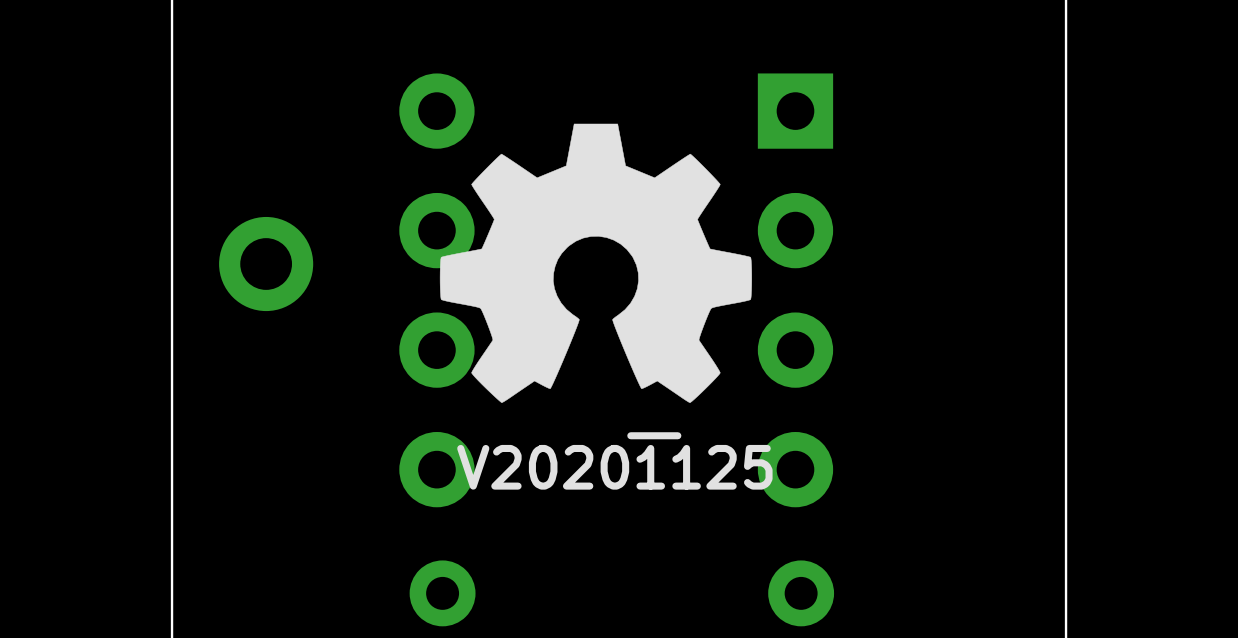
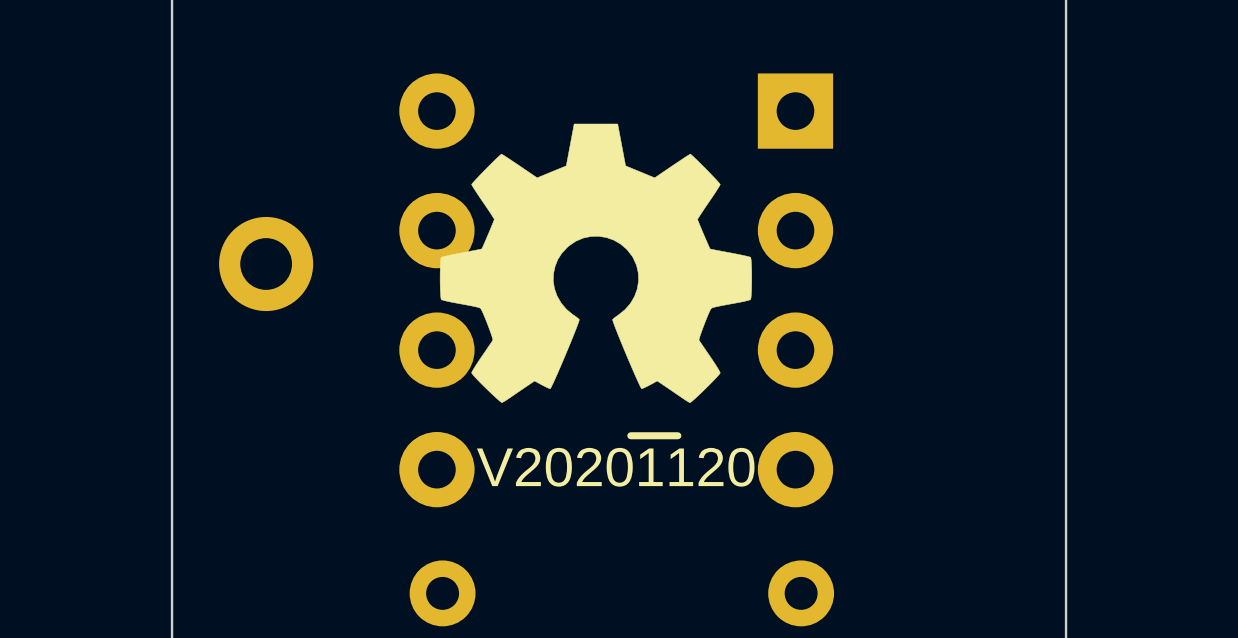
drawing shape: [457, 432, 773, 490] -> [476, 432, 755, 487]

